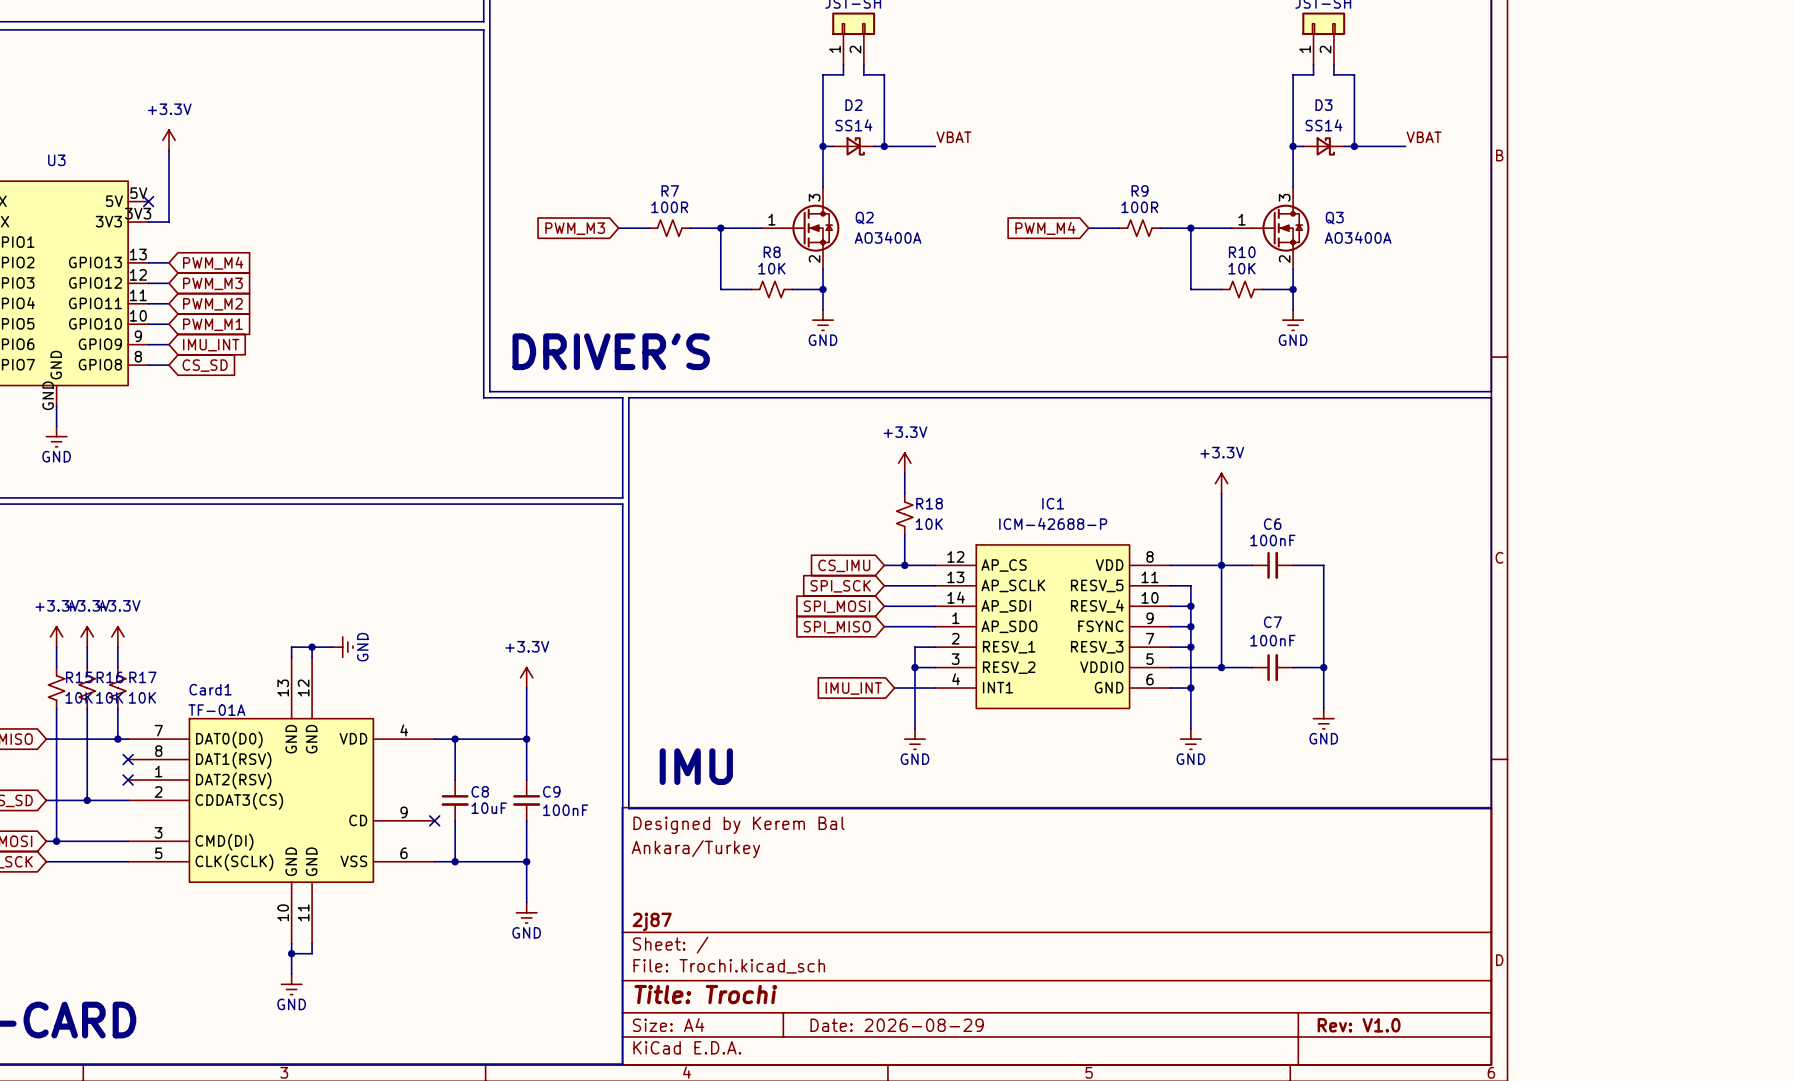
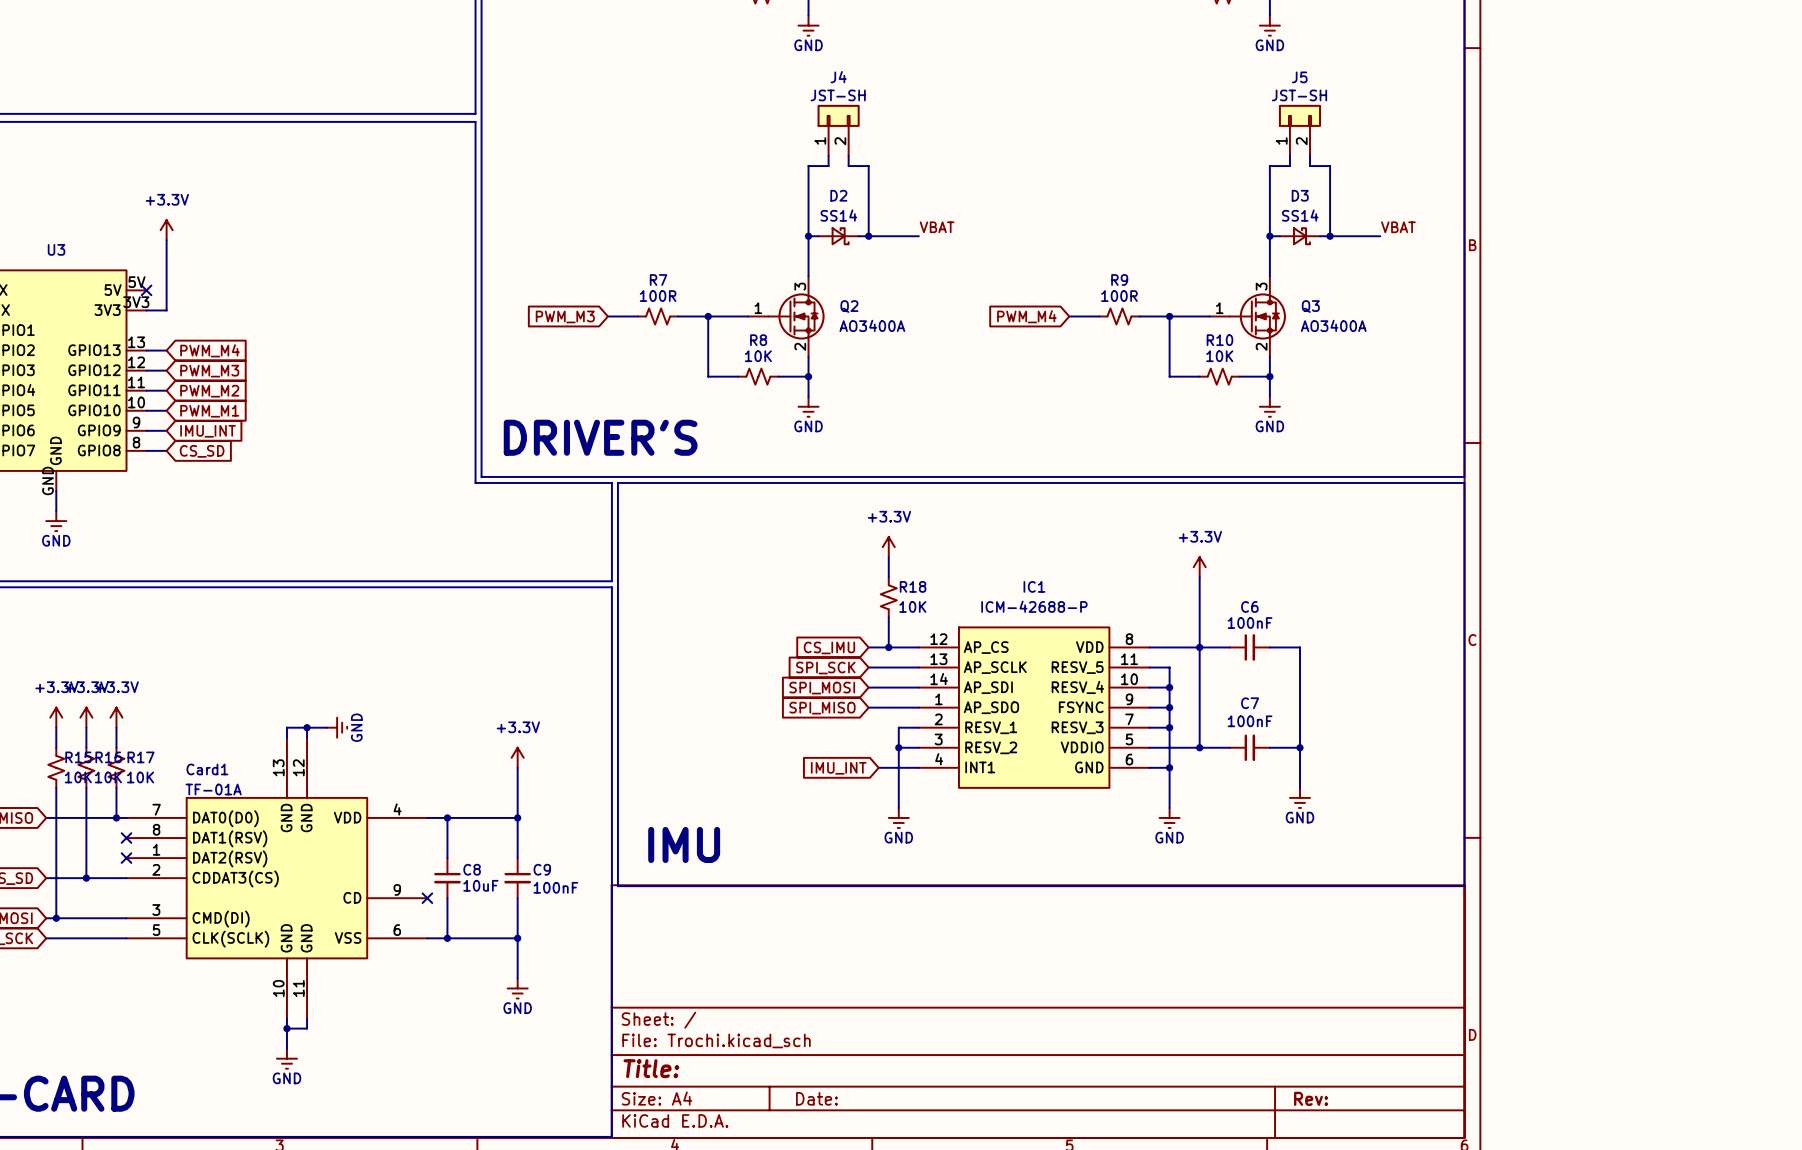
title block: Designed by Kerem Bal (739, 825) -> none
title block: Ankara/Turkey (695, 849) -> none
title block: 2j87 (652, 921) -> none
title block: Title: Trochi (705, 994) -> Title: (651, 1068)
title block: Date: 2026-08-29 (897, 1025) -> Date: (816, 1098)
title block: Rev: V1.0 (1359, 1025) -> Rev: (1310, 1098)

